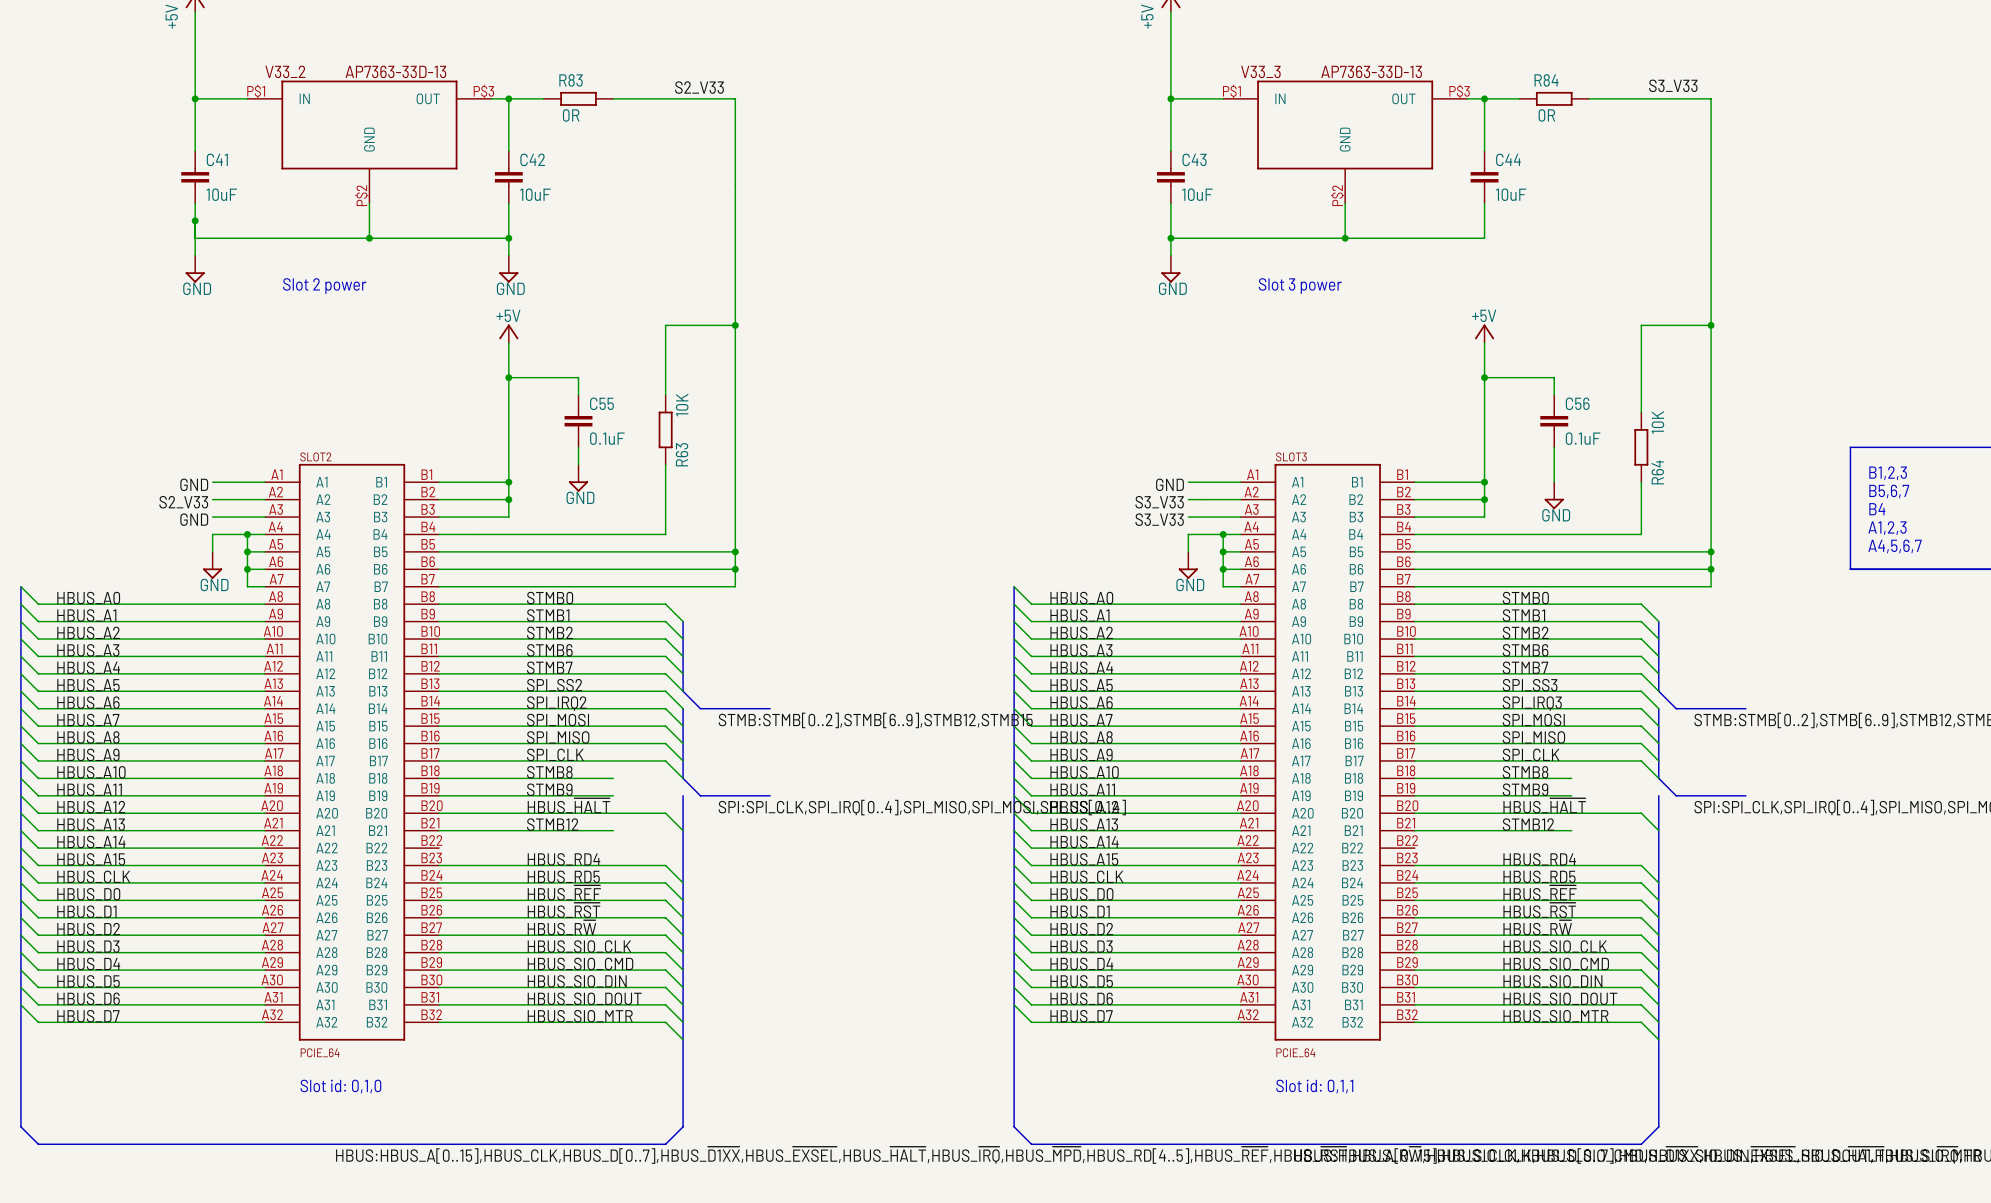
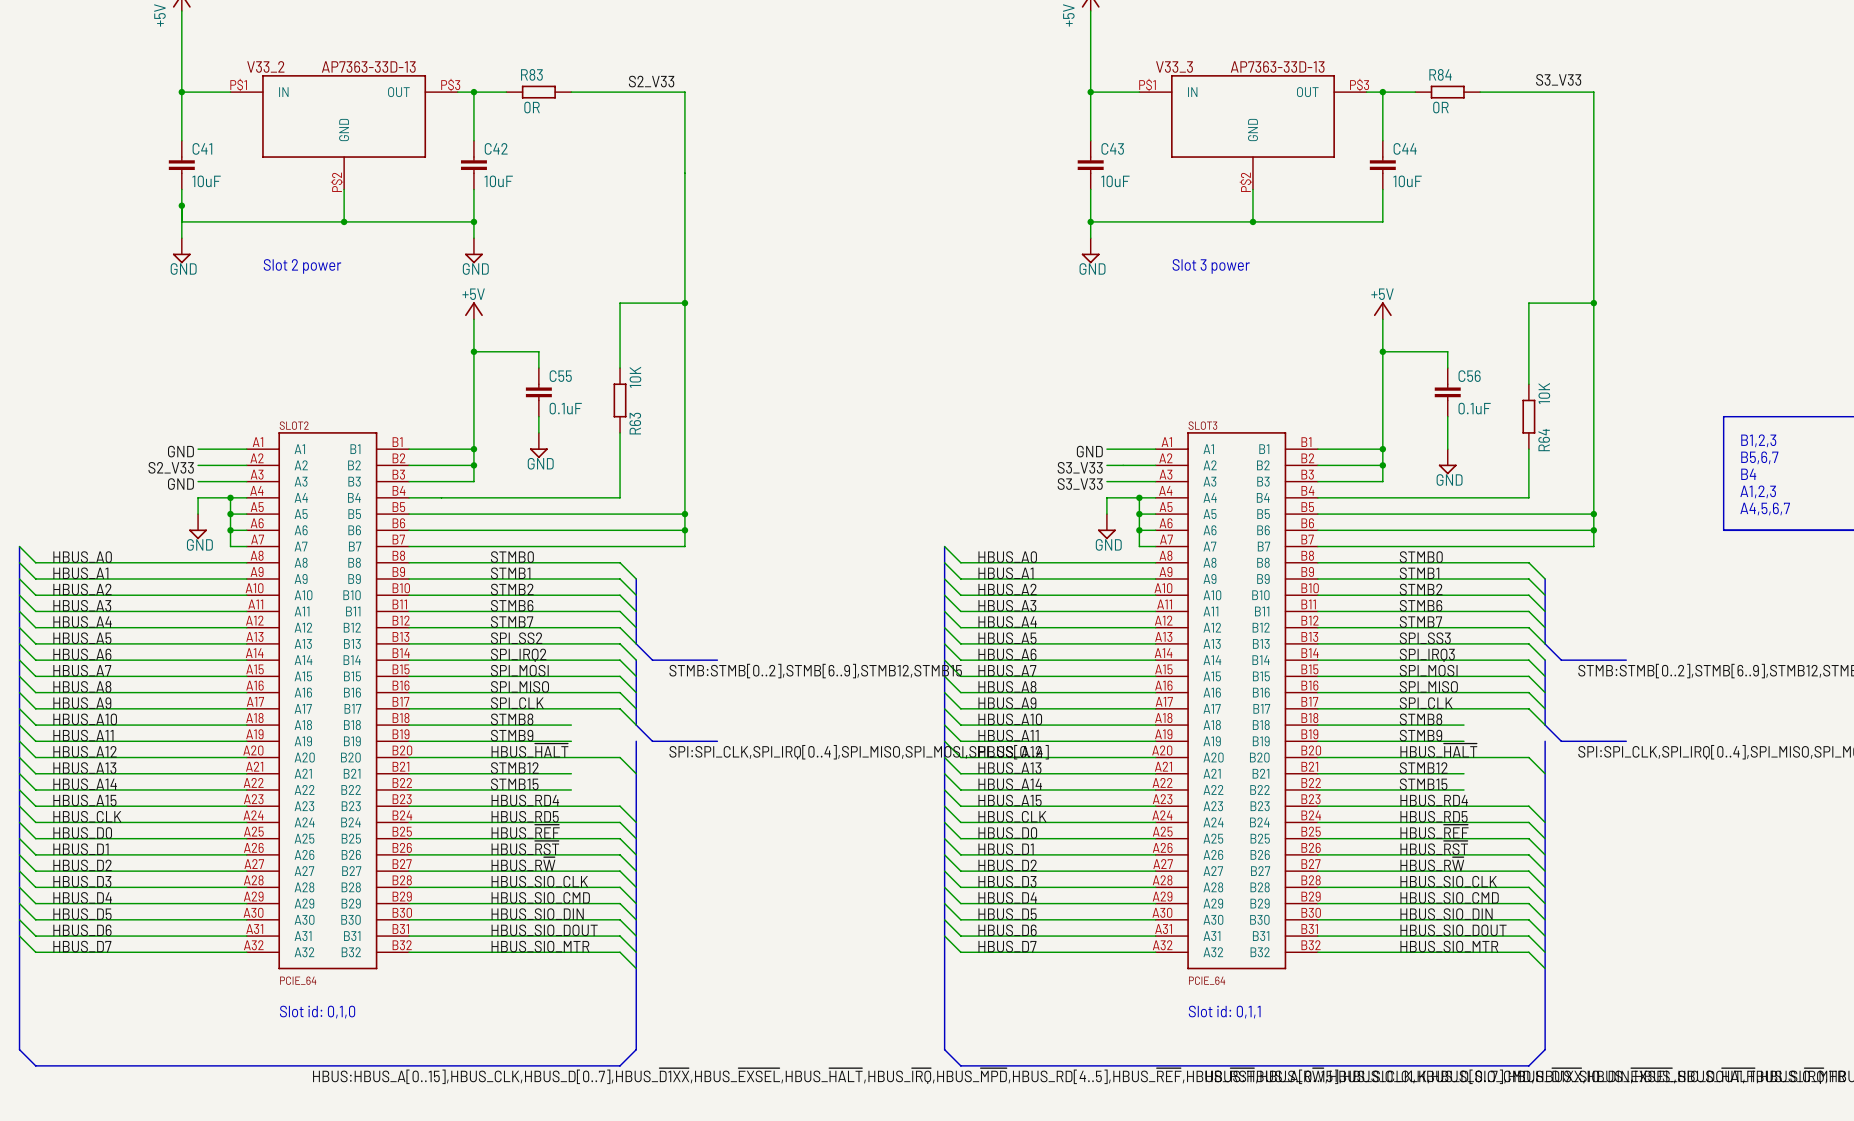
label: none -> STMB15 (514, 784)
label: none -> STMB15 (1423, 784)
wire: none -> (409, 789) (571, 789)
wire: none -> (1317, 789) (1463, 789)

